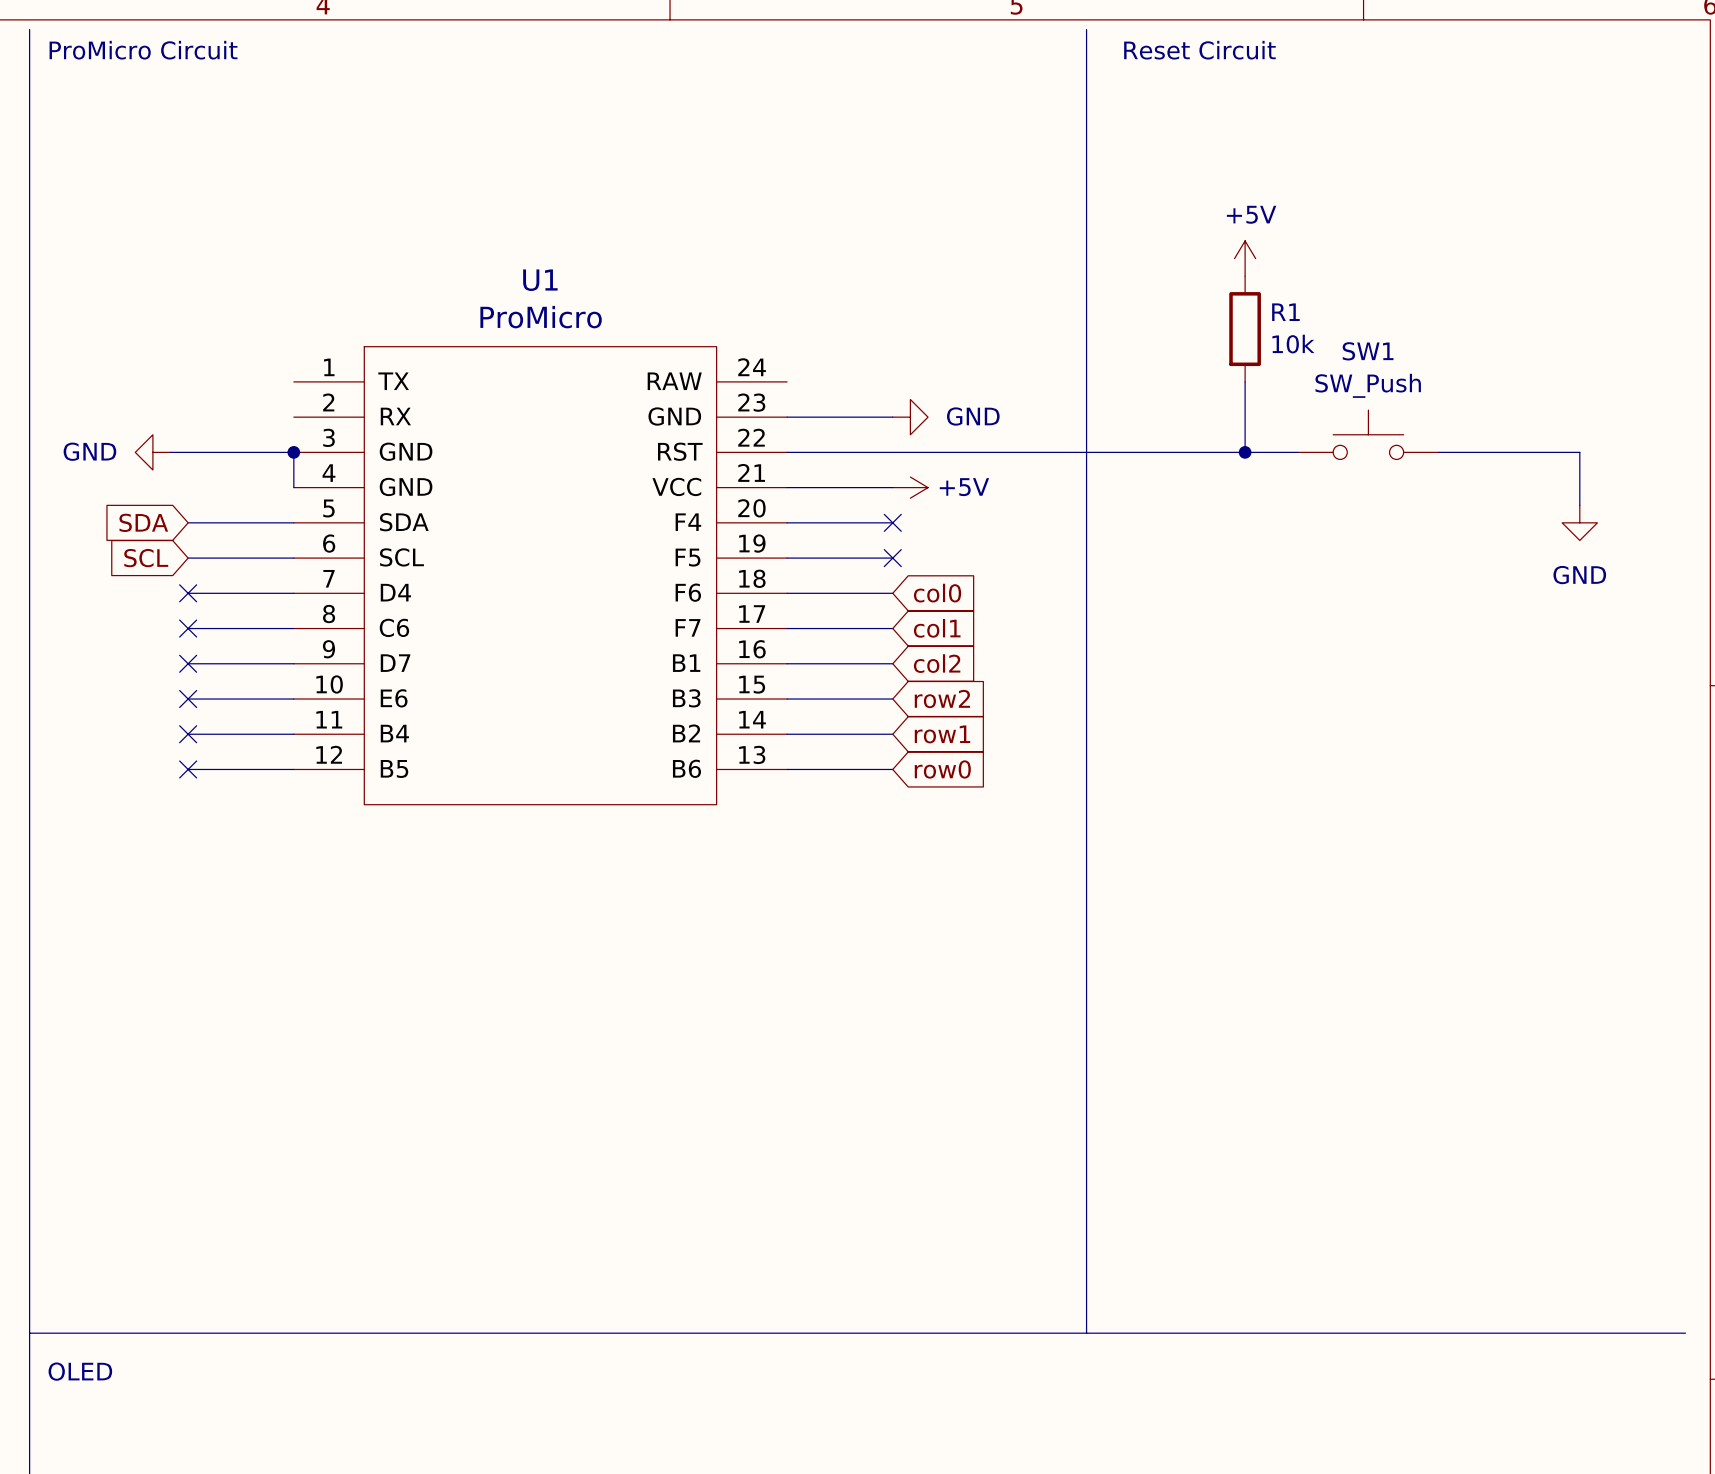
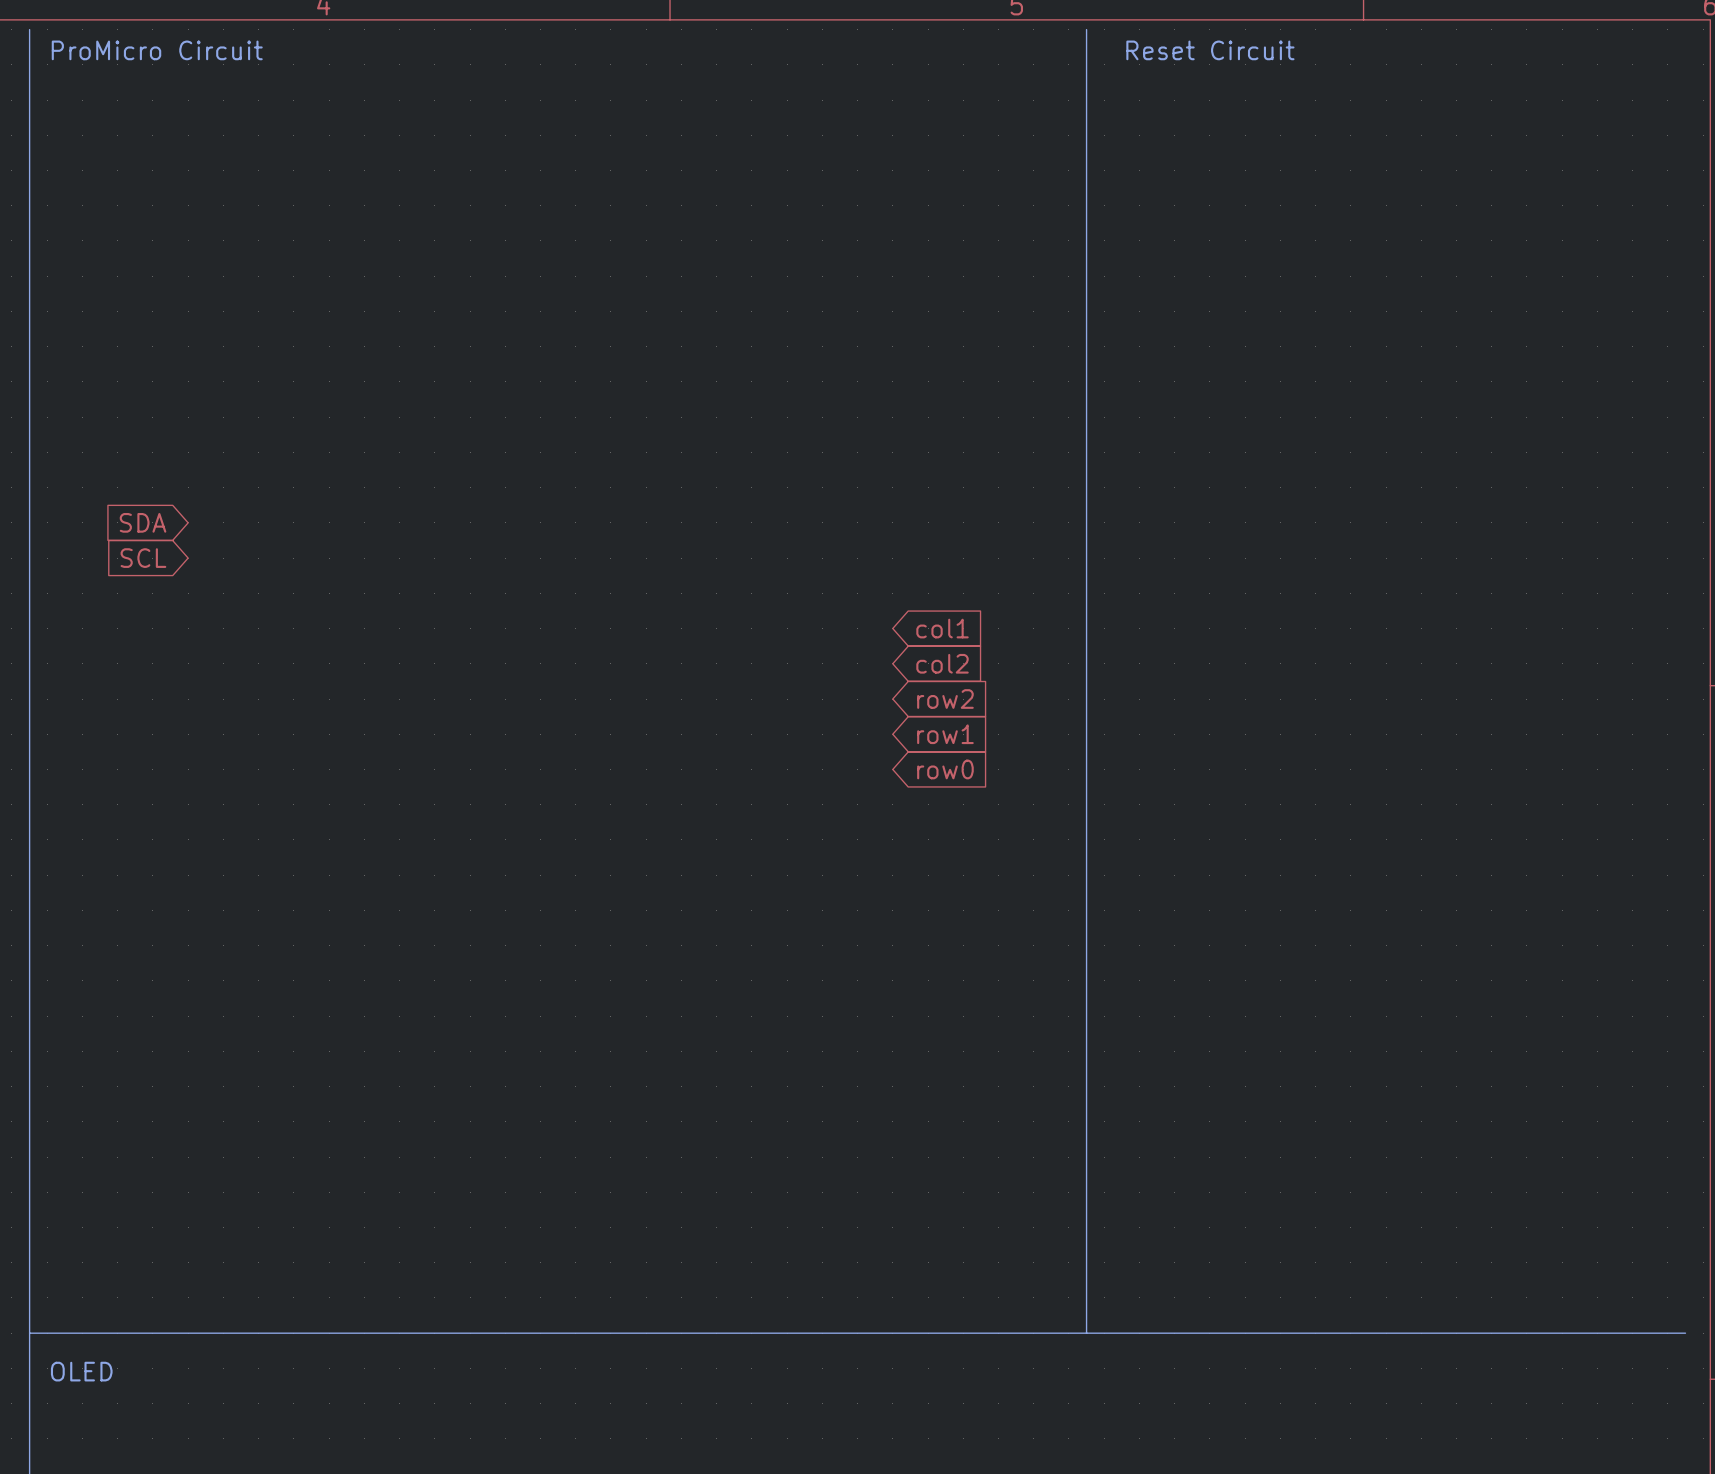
power symbol: +5V (1245, 258) -> none
R1: 10k (1245, 329) -> none
wire: (1245, 381) (1245, 452) -> none
wire: (787, 417) (892, 417) -> none
power symbol: GND (910, 417) -> none
SW1: SW_Push (1368, 434) -> none
power symbol: GND (152, 452) -> none
wire: (170, 452) (293, 452) (293, 487) -> none
junction: (293, 452) -> none
wire: (787, 452) (1297, 452) -> none
junction: (1245, 452) -> none
wire: (1438, 452) (1579, 452) (1579, 505) -> none
wire: (787, 487) (892, 487) -> none
power symbol: +5V (910, 487) -> none
wire: (188, 522) (293, 522) -> none
wire: (787, 522) (892, 522) -> none
no-connect mark: (892, 522) -> none
power symbol: GND (1579, 522) -> none
wire: (188, 558) (293, 558) -> none
wire: (787, 558) (892, 558) -> none
no-connect mark: (892, 558) -> none
U1: ProMicro (540, 575) -> none
wire: (188, 593) (293, 593) -> none
no-connect mark: (188, 593) -> none
wire: (787, 593) (892, 593) -> none
global label: col0 (937, 593) -> none
wire: (188, 628) (293, 628) -> none
no-connect mark: (188, 628) -> none
wire: (787, 628) (892, 628) -> none
wire: (188, 663) (293, 663) -> none
no-connect mark: (188, 663) -> none
wire: (787, 663) (892, 663) -> none
wire: (188, 699) (293, 699) -> none
no-connect mark: (188, 699) -> none
wire: (787, 699) (892, 699) -> none
wire: (188, 734) (293, 734) -> none
no-connect mark: (188, 734) -> none
wire: (787, 734) (892, 734) -> none
wire: (188, 769) (293, 769) -> none
no-connect mark: (188, 769) -> none
wire: (787, 769) (892, 769) -> none

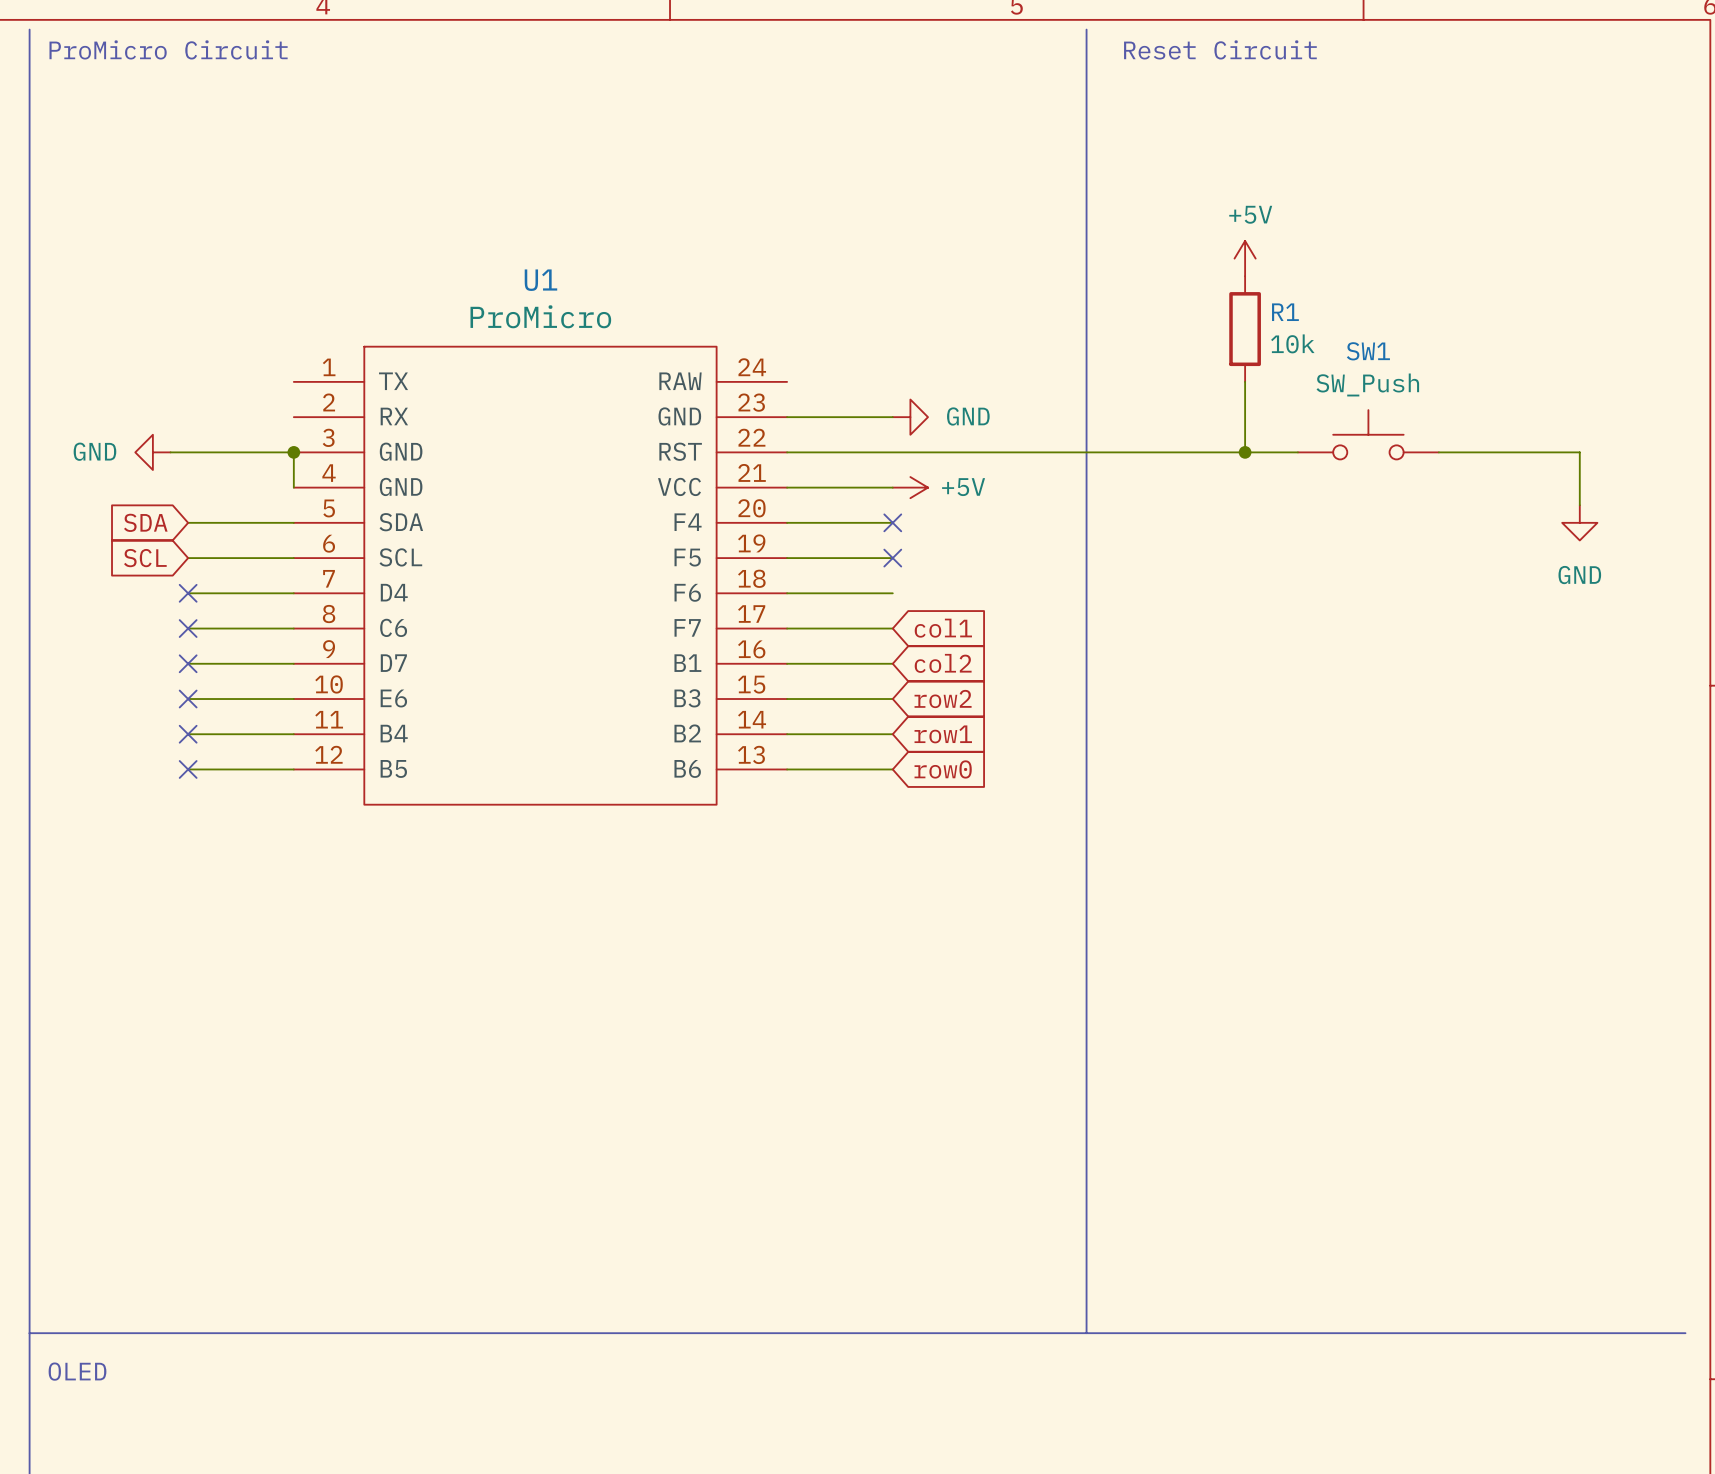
power symbol: none -> +5V (1245, 258)
R1: none -> 10k (1245, 329)
wire: none -> (1245, 381) (1245, 452)
wire: none -> (787, 417) (892, 417)
power symbol: none -> GND (910, 417)
SW1: none -> SW_Push (1368, 434)
power symbol: none -> GND (152, 452)
wire: none -> (170, 452) (293, 452) (293, 487)
junction: none -> (293, 452)
wire: none -> (787, 452) (1297, 452)
junction: none -> (1245, 452)
wire: none -> (1438, 452) (1579, 452) (1579, 505)
wire: none -> (787, 487) (892, 487)
power symbol: none -> +5V (910, 487)
wire: none -> (188, 522) (293, 522)
wire: none -> (787, 522) (892, 522)
no-connect mark: none -> (892, 522)
power symbol: none -> GND (1579, 522)
wire: none -> (188, 558) (293, 558)
wire: none -> (787, 558) (892, 558)
no-connect mark: none -> (892, 558)
U1: none -> ProMicro (540, 575)
wire: none -> (188, 593) (293, 593)
no-connect mark: none -> (188, 593)
wire: none -> (787, 593) (892, 593)
wire: none -> (188, 628) (293, 628)
no-connect mark: none -> (188, 628)
wire: none -> (787, 628) (892, 628)
wire: none -> (188, 663) (293, 663)
no-connect mark: none -> (188, 663)
wire: none -> (787, 663) (892, 663)
wire: none -> (188, 699) (293, 699)
no-connect mark: none -> (188, 699)
wire: none -> (787, 699) (892, 699)
wire: none -> (188, 734) (293, 734)
no-connect mark: none -> (188, 734)
wire: none -> (787, 734) (892, 734)
wire: none -> (188, 769) (293, 769)
no-connect mark: none -> (188, 769)
wire: none -> (787, 769) (892, 769)

